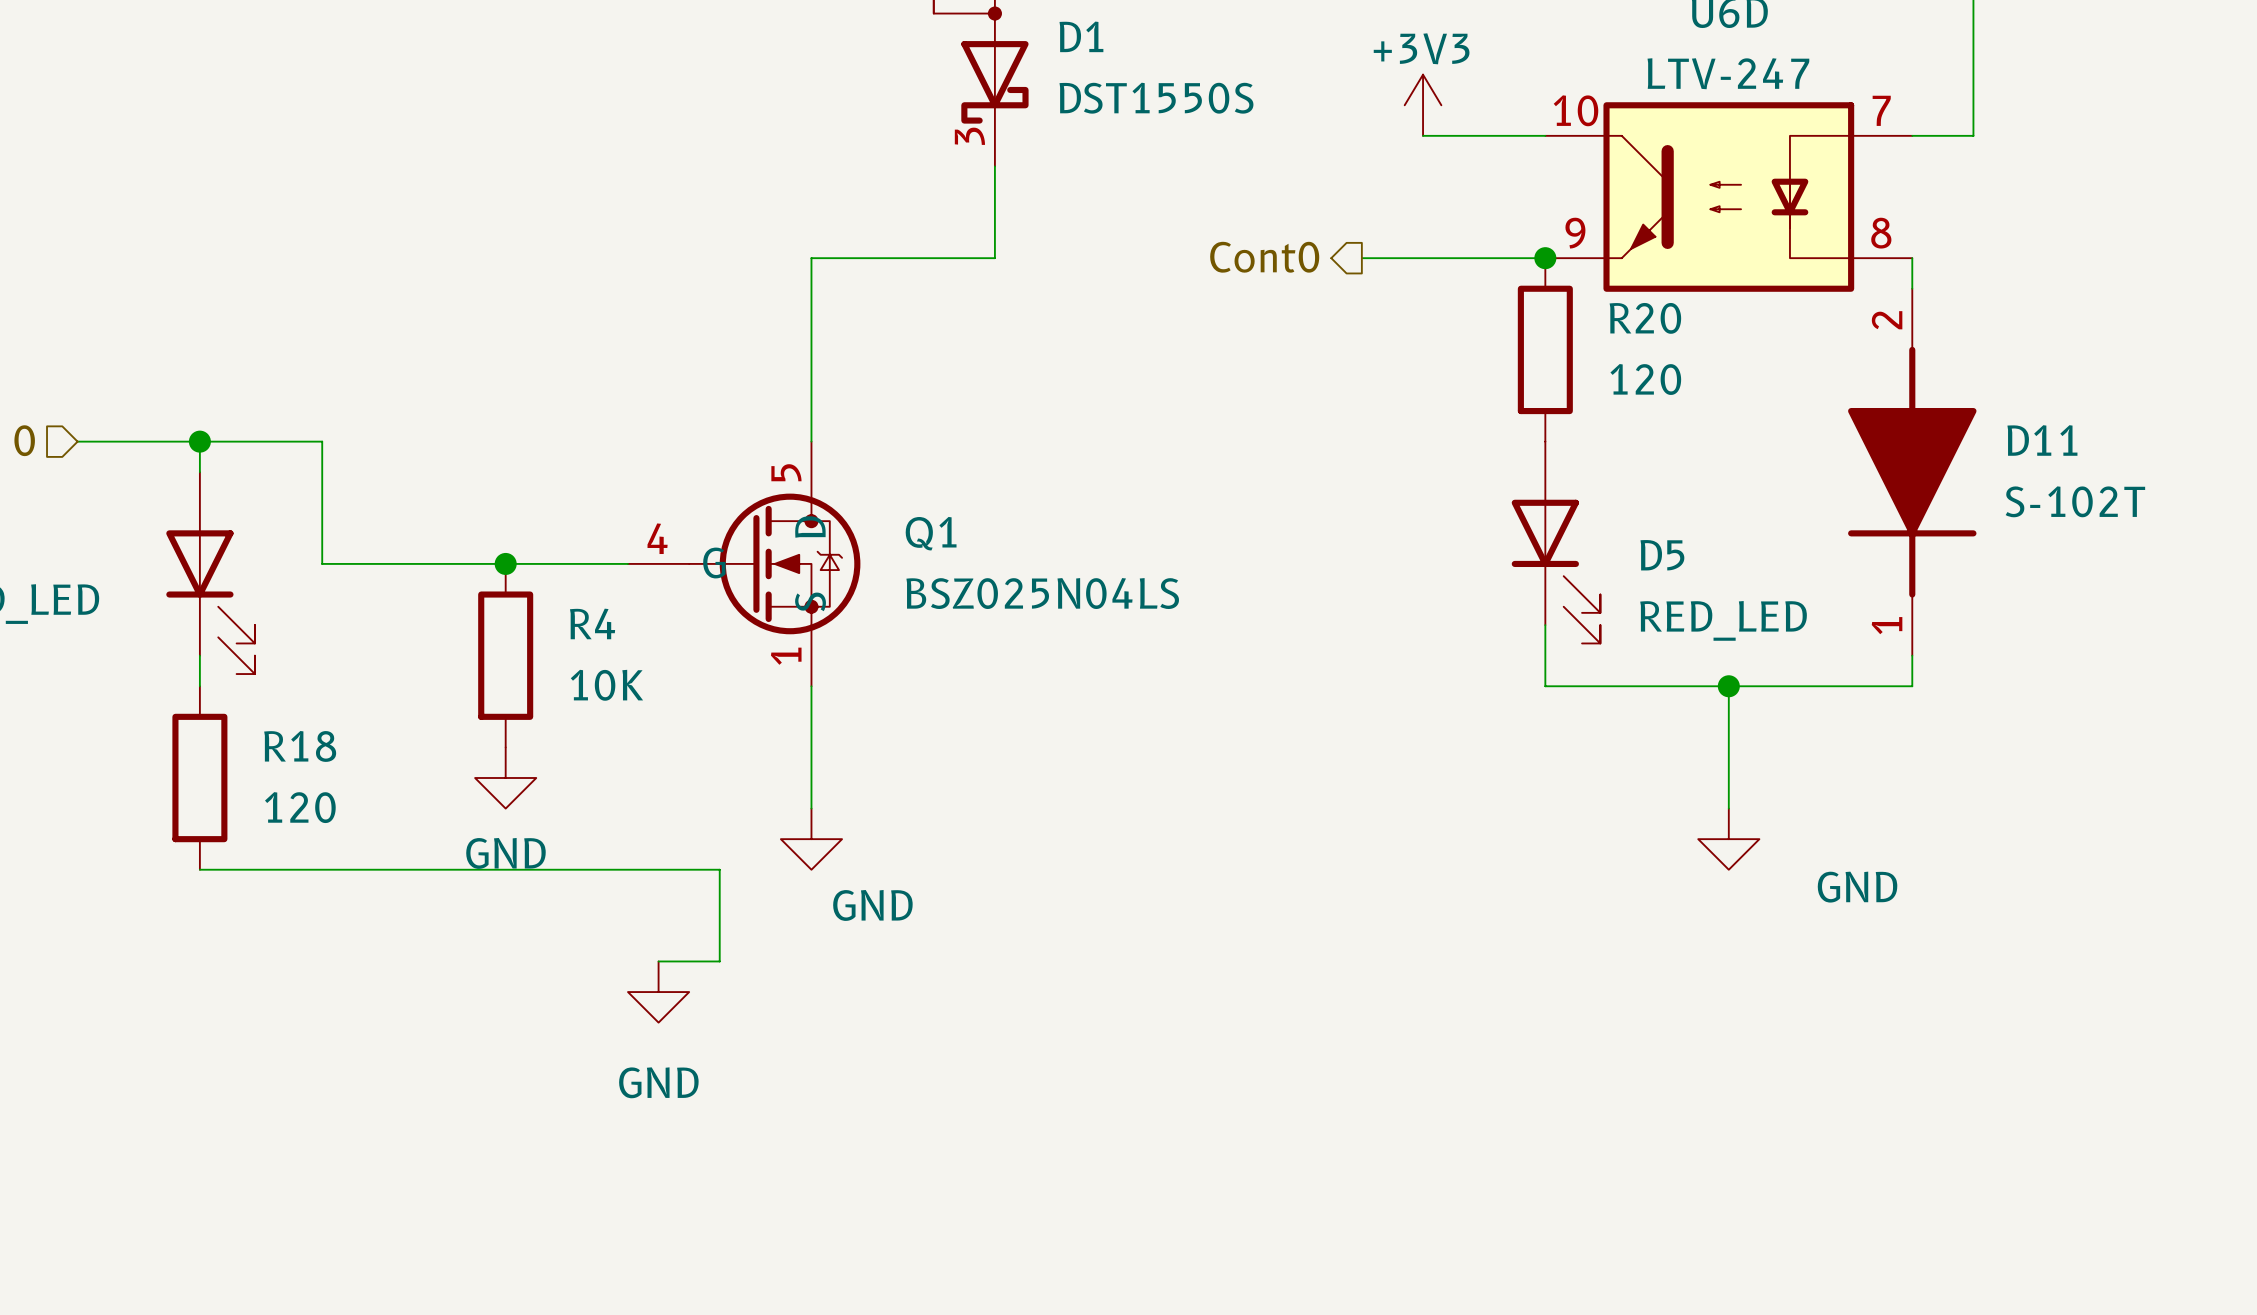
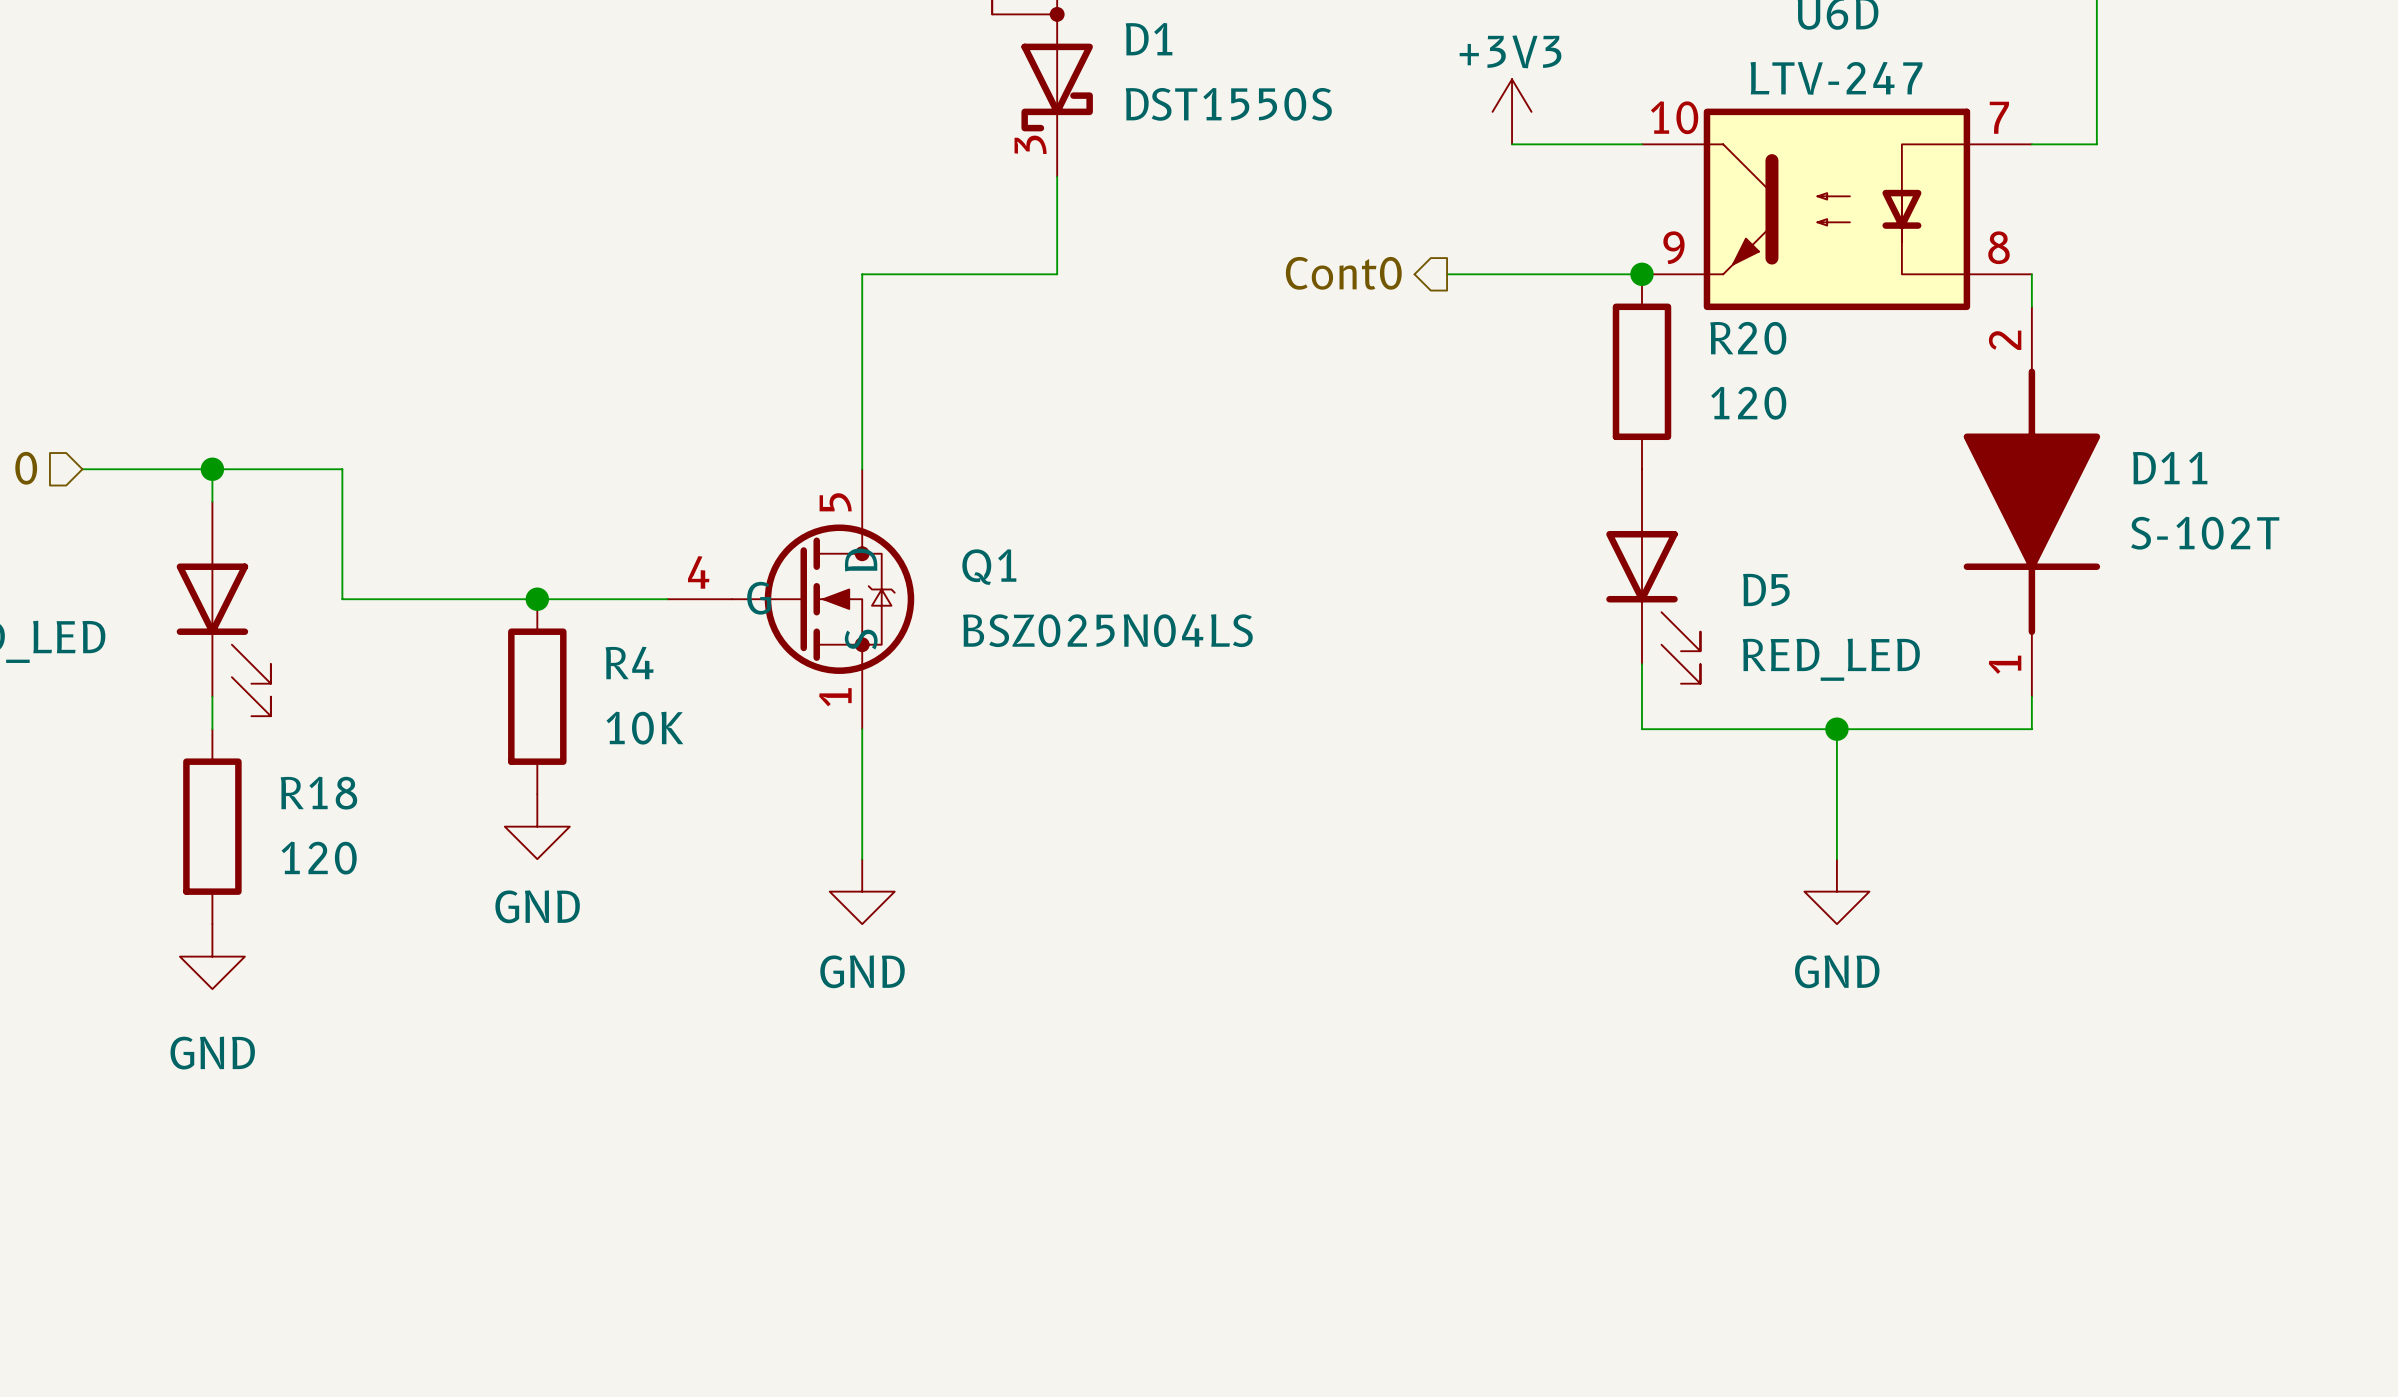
wire: (199, 869) (719, 869) (719, 961) (658, 961) -> none
power symbol text position: GND (1857, 887) -> GND (1837, 971)
power symbol text position: GND (872, 905) -> GND (862, 971)
power symbol position: GND (658, 992) -> GND (212, 956)

